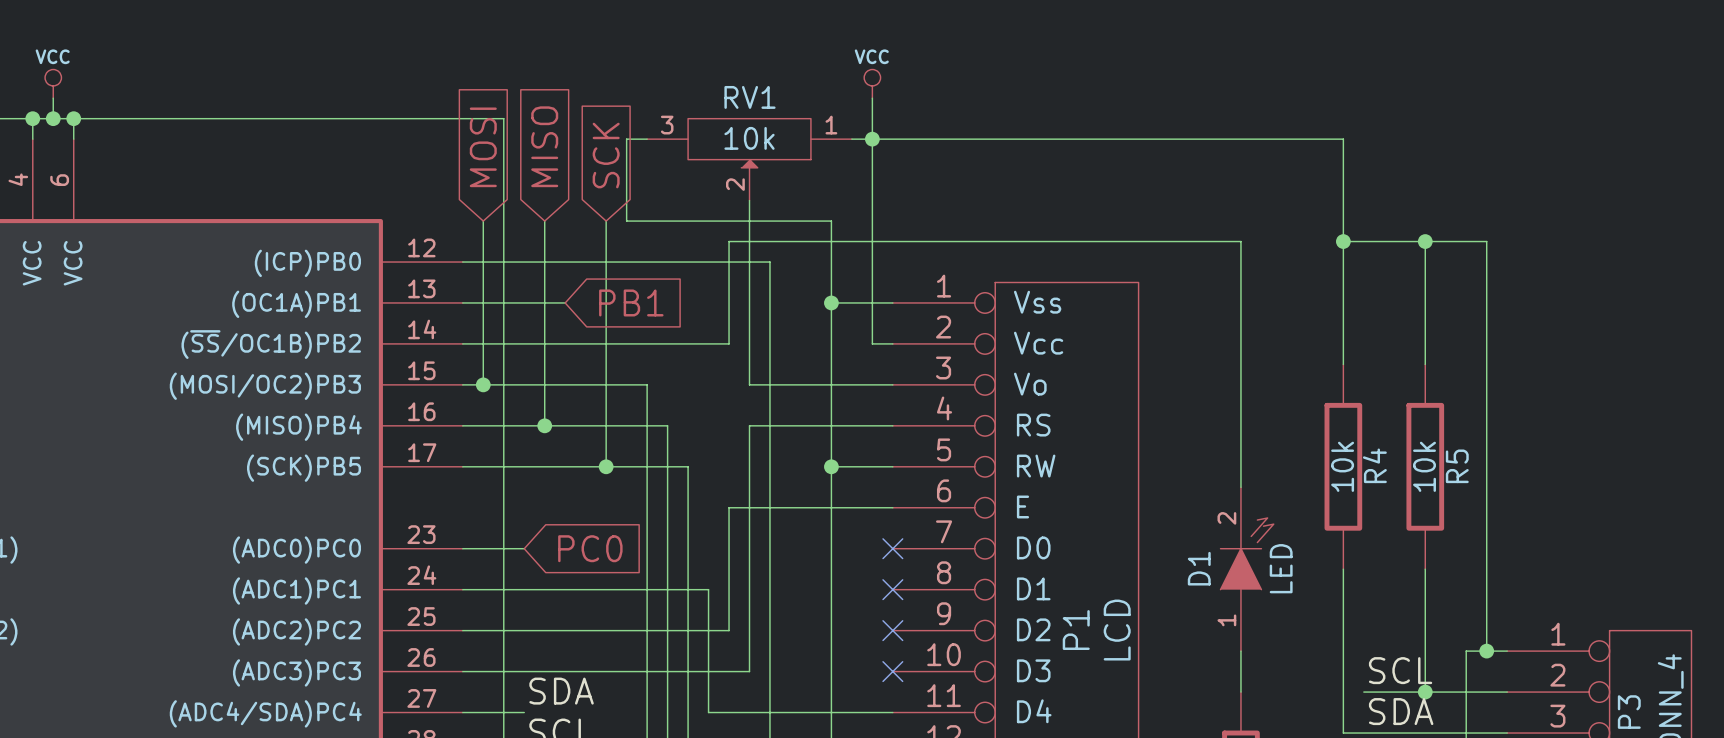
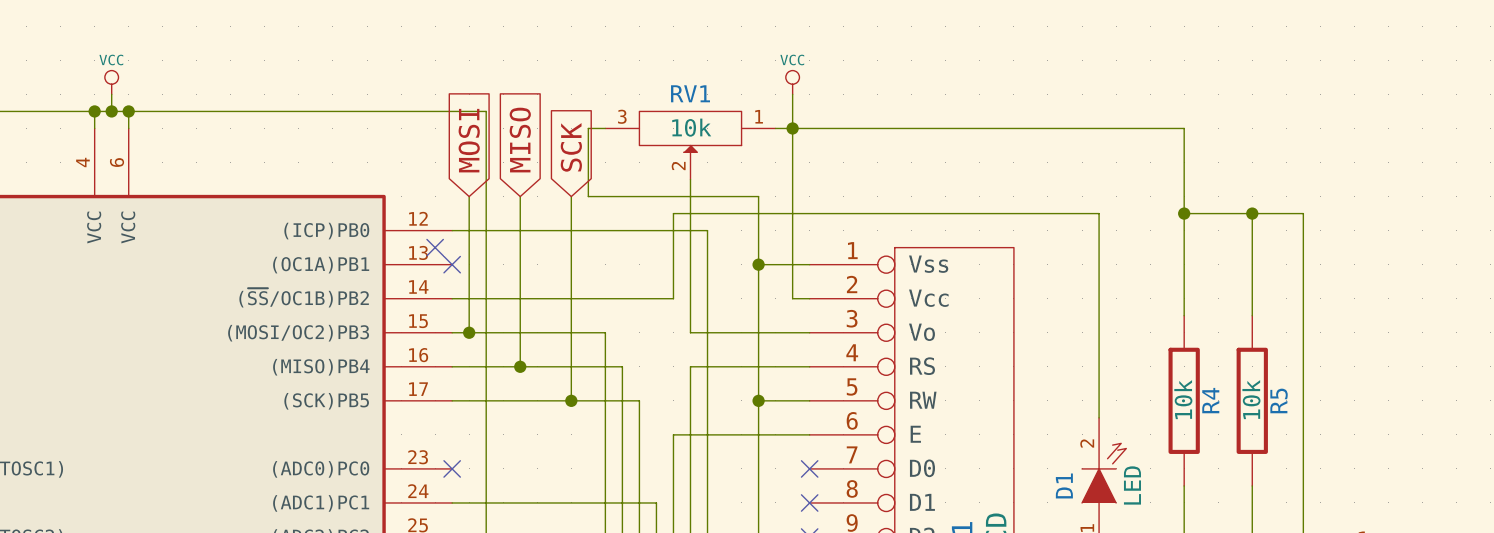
no-connect mark: none -> (435, 247)
wire: (462, 302) (565, 302) -> none
no-connect mark: none -> (452, 264)
global label: PB1 (631, 302) -> none
wire: (462, 548) (524, 548) -> none
no-connect mark: none -> (452, 468)
global label: PC0 (590, 548) -> none

